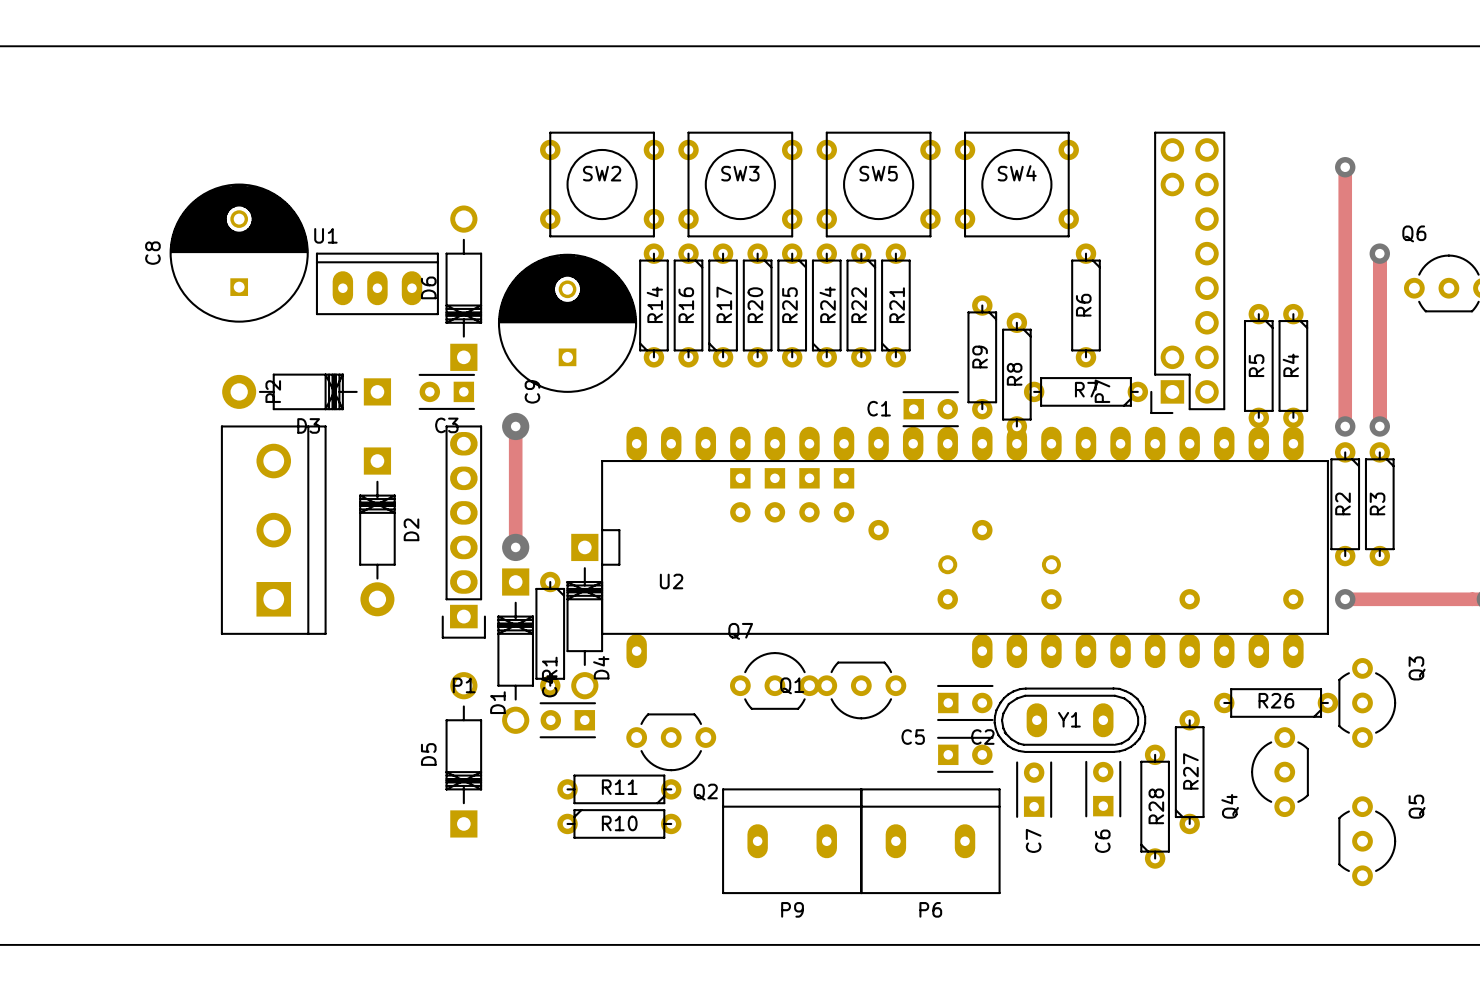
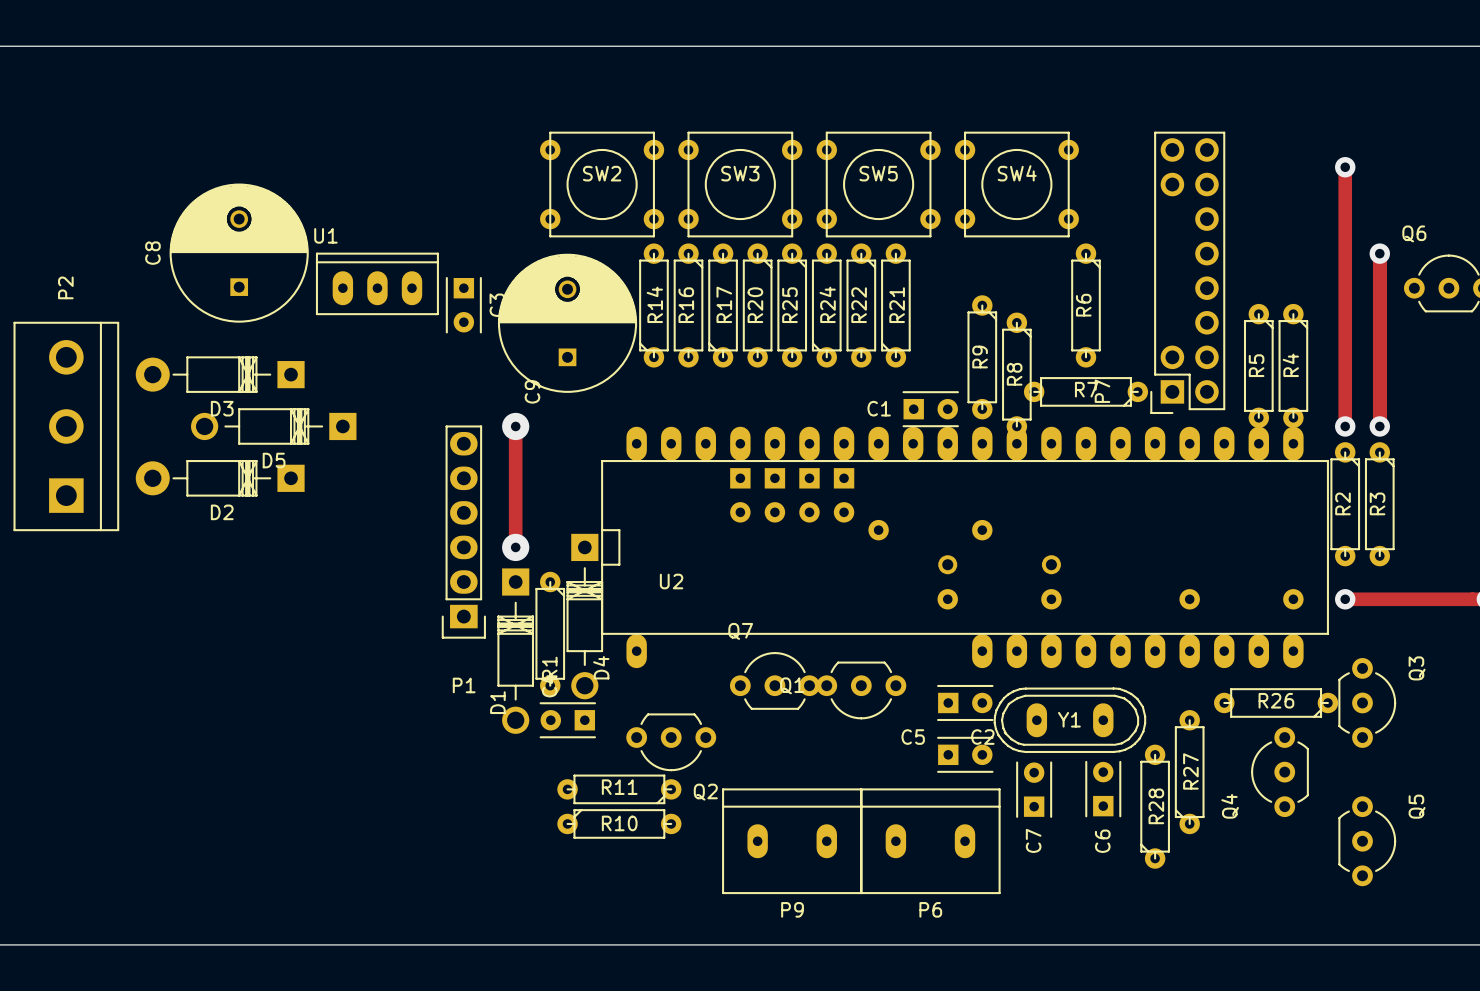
D6: (463, 288) -> none
D3 position: (306, 391) -> (220, 374)
C3 rotation: 0° (446, 391) -> 90° counterclockwise (463, 305)
C3 position: (446, 391) -> (463, 305)
P2 position: (273, 530) -> (66, 426)
D2 rotation: 0° (377, 531) -> 90° clockwise (220, 478)
D2 position: (377, 531) -> (220, 478)
D5 rotation: 0° (463, 754) -> 90° counterclockwise (273, 426)
D5 position: (463, 754) -> (273, 426)

